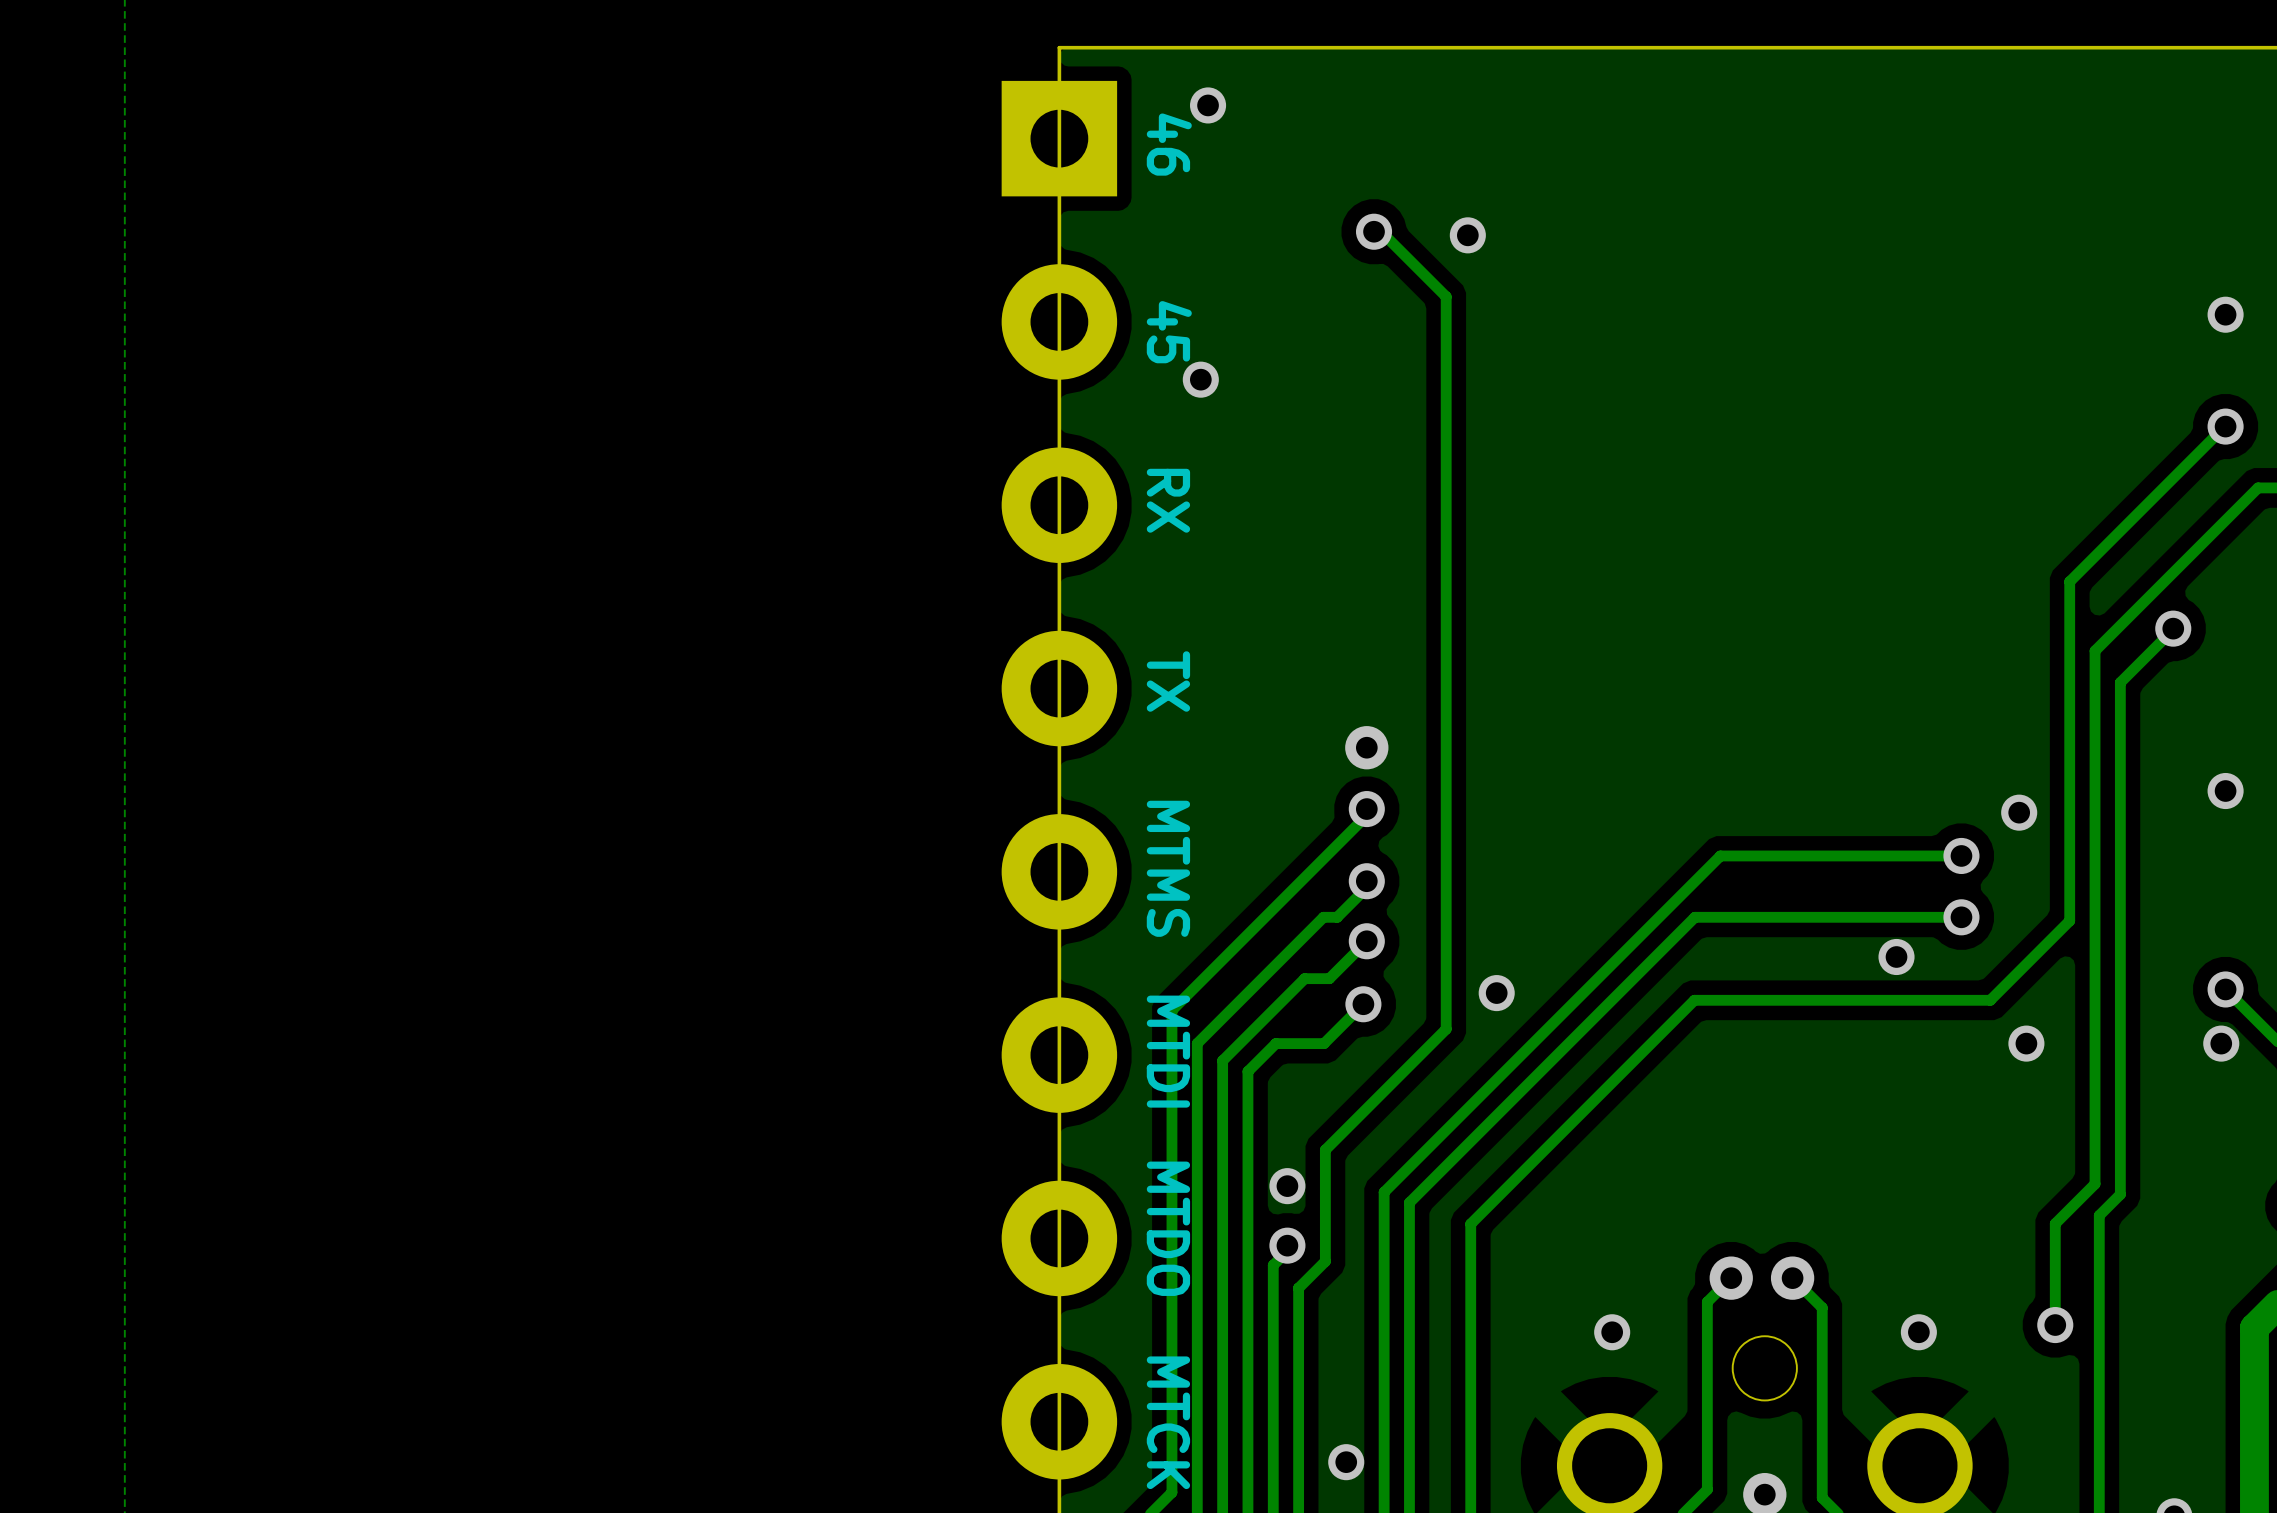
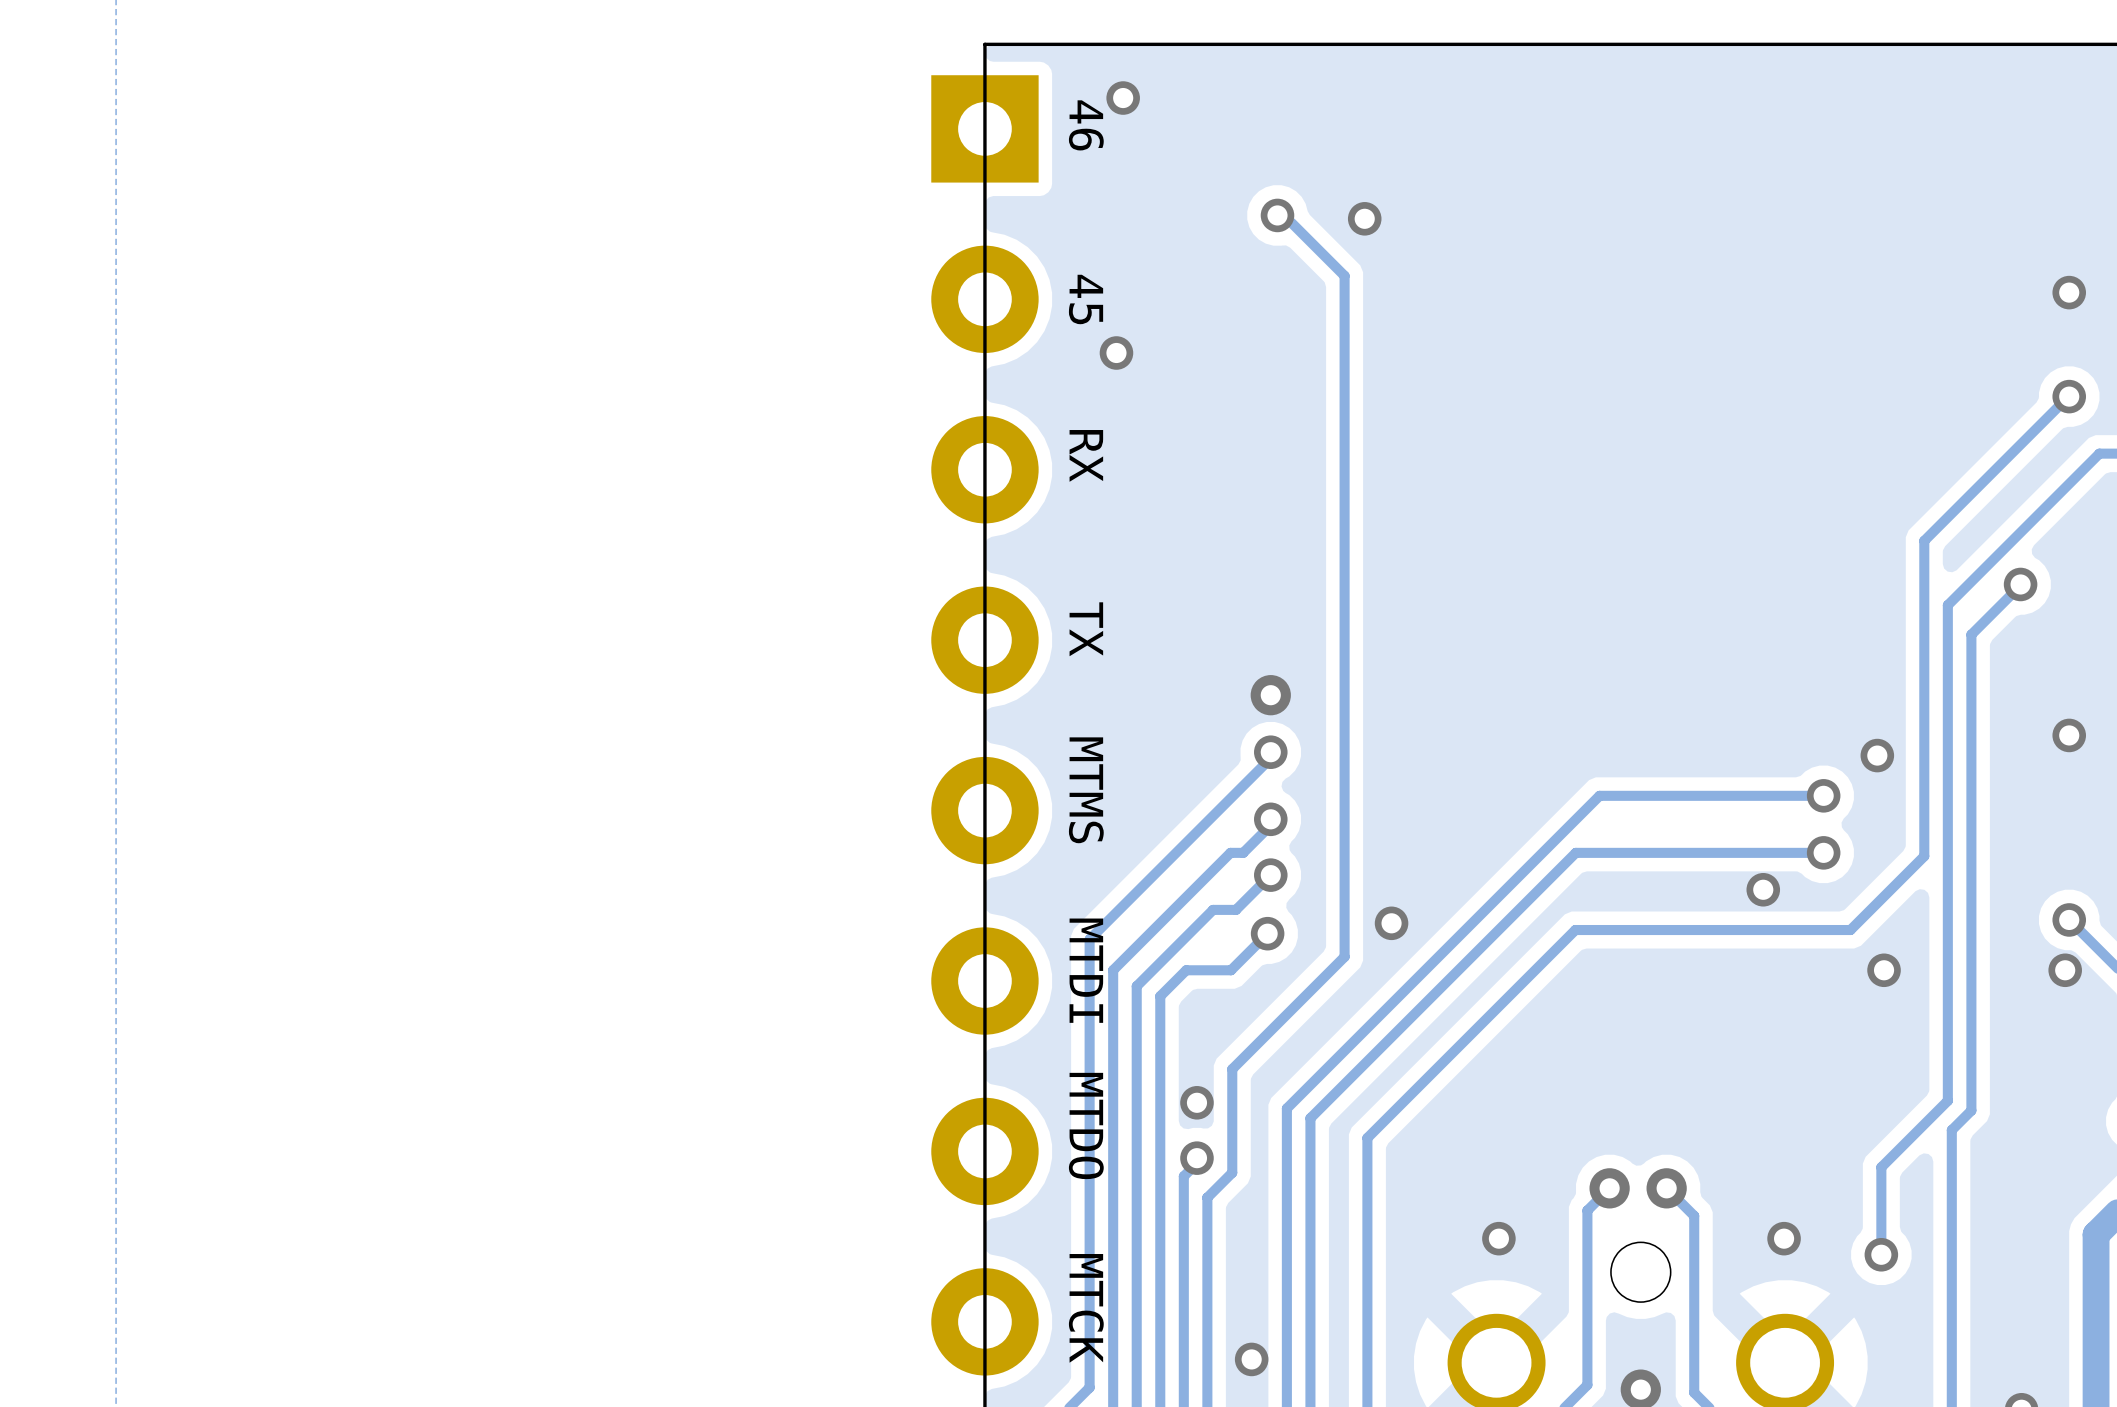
track: (2055, 1223) (2055, 1325) -> (1910, 1137) (1881, 1167) (1881, 1254)
via position: (2055, 1325) -> (1881, 1254)

